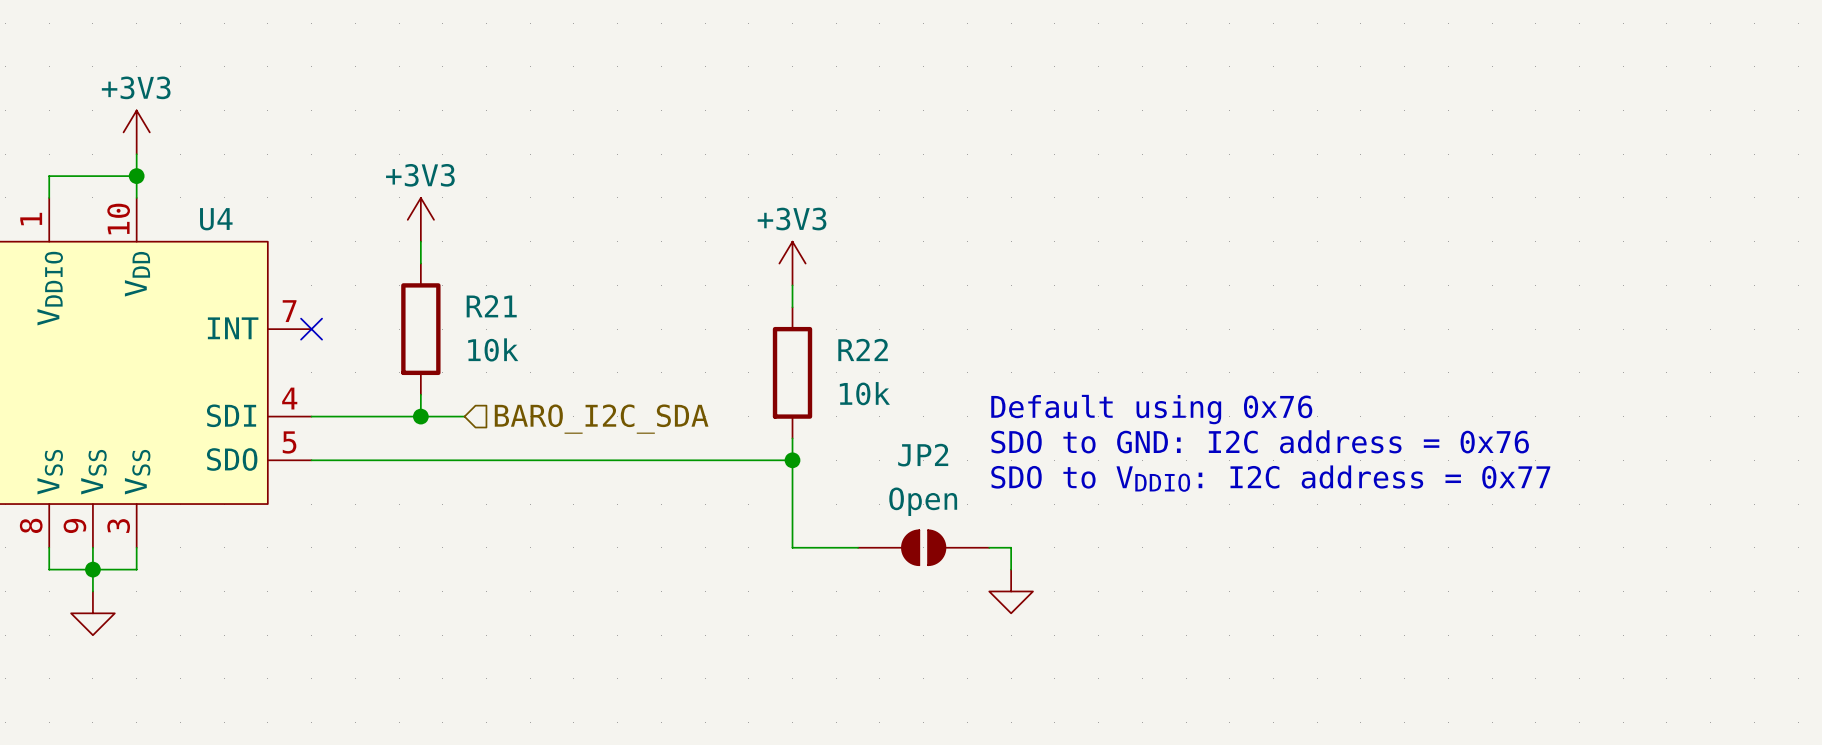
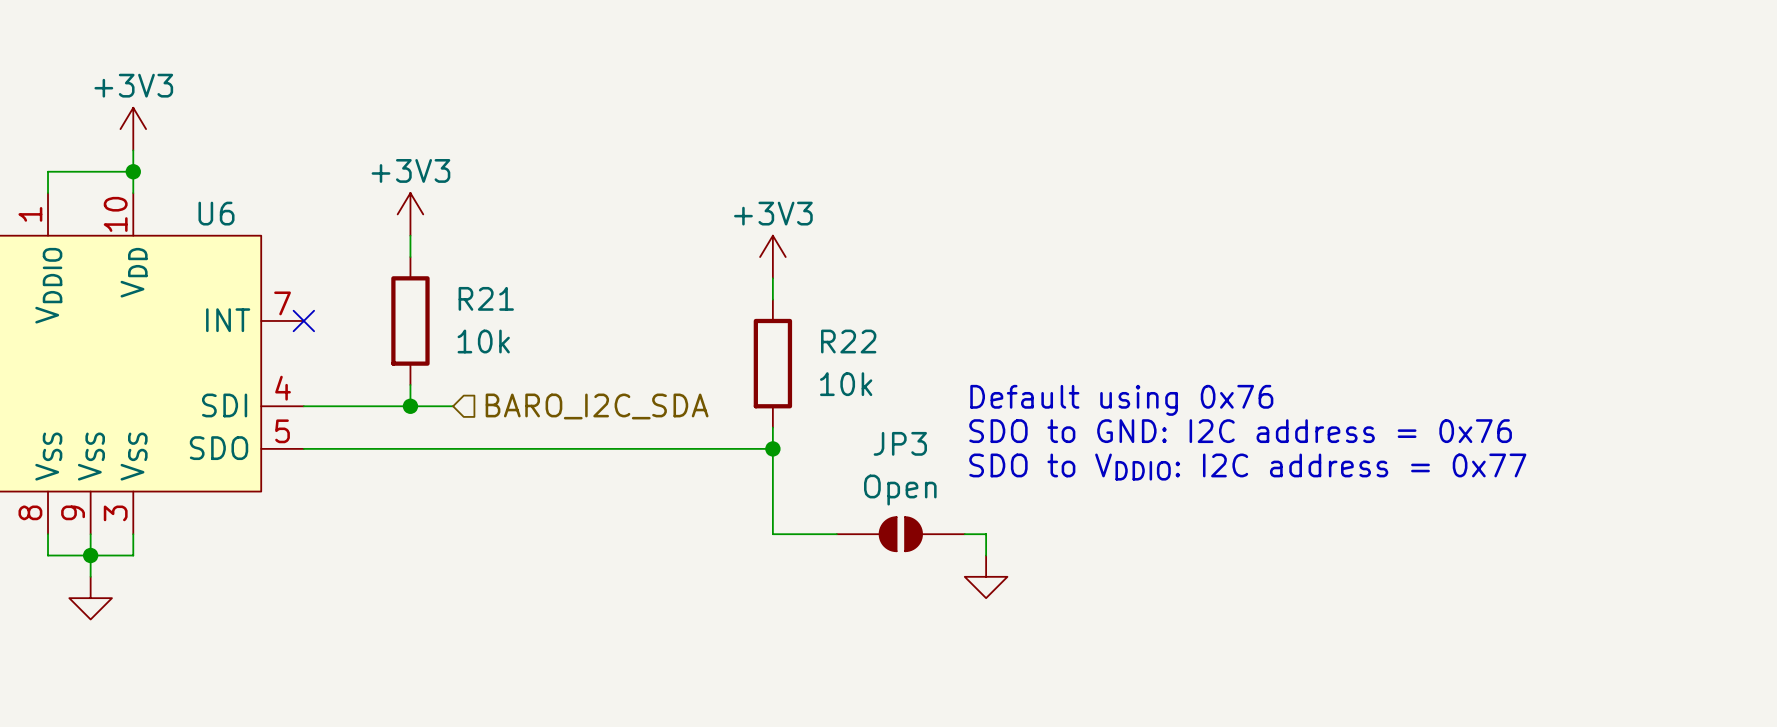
U4 name: U4 (216, 219) -> U6 (216, 213)
JP2 name: JP2 (923, 455) -> JP3 (900, 443)

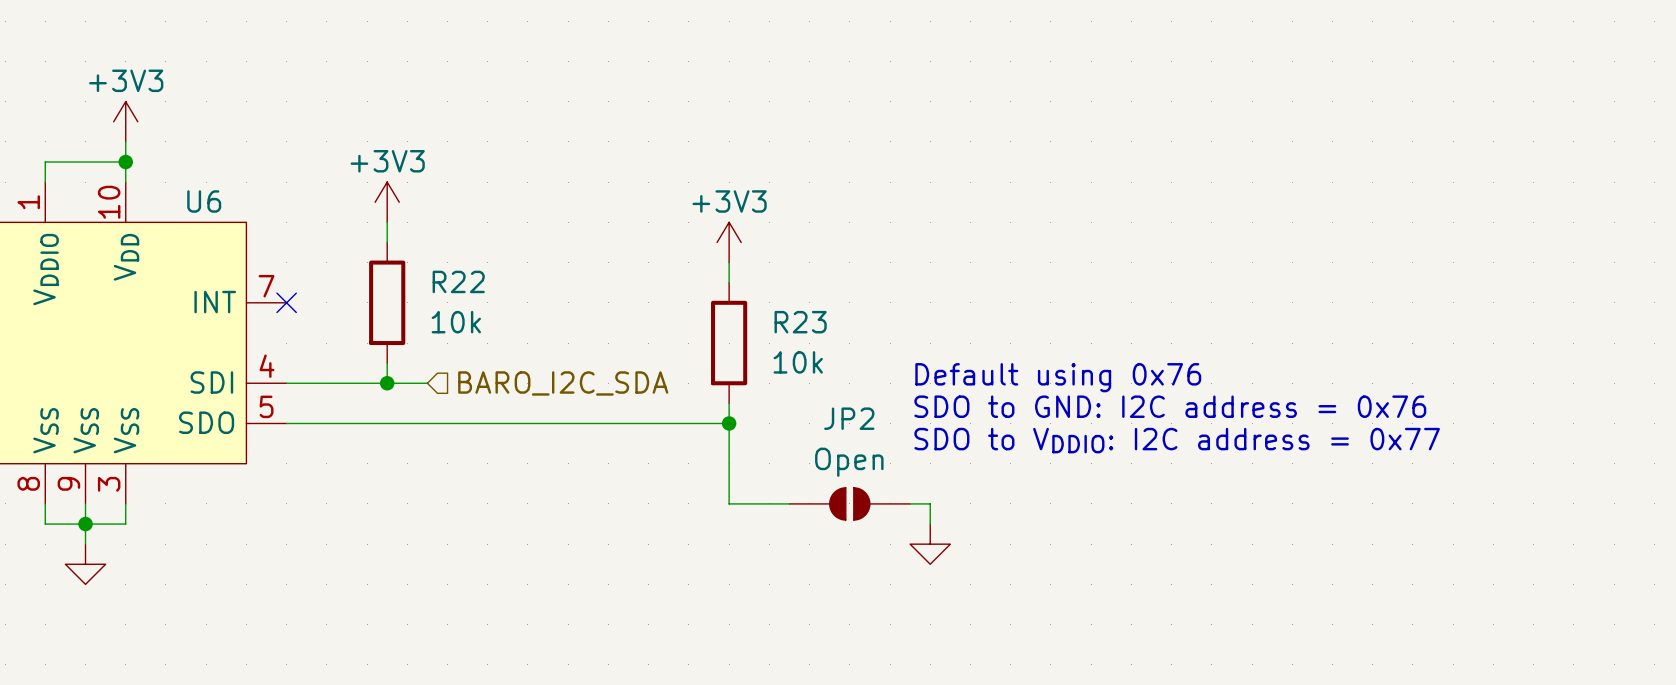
R21 name: R21 (486, 298) -> R22 (458, 281)
R22 name: R22 (848, 341) -> R23 (800, 322)
JP3 name: JP3 (900, 443) -> JP2 (849, 418)

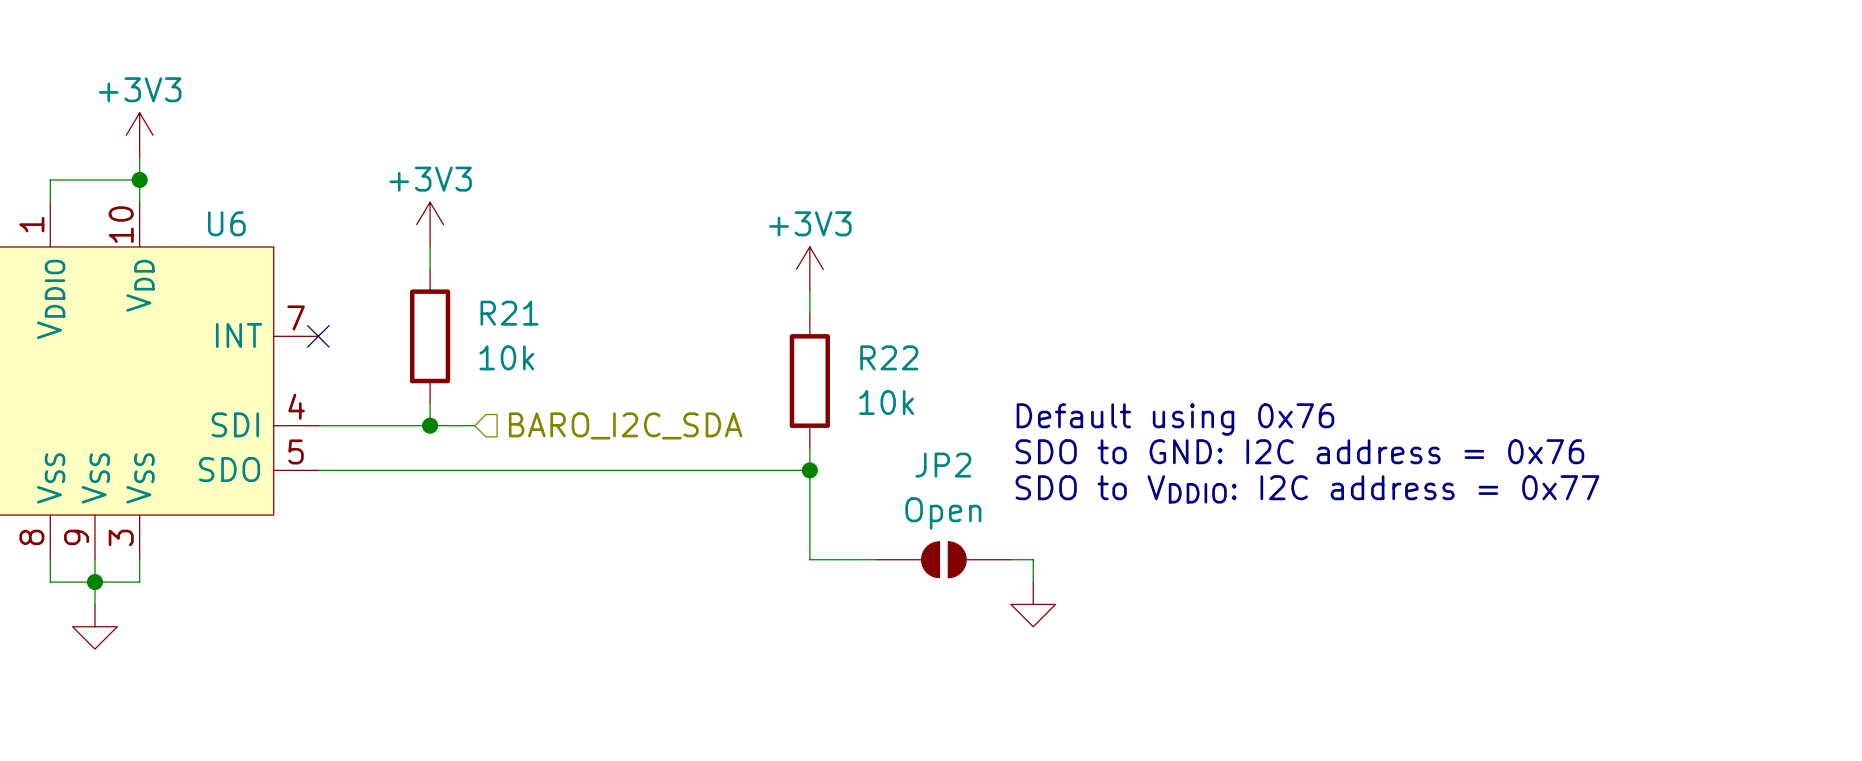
R22 name: R22 (458, 281) -> R21 (509, 313)
R23 name: R23 (800, 322) -> R22 (889, 357)

